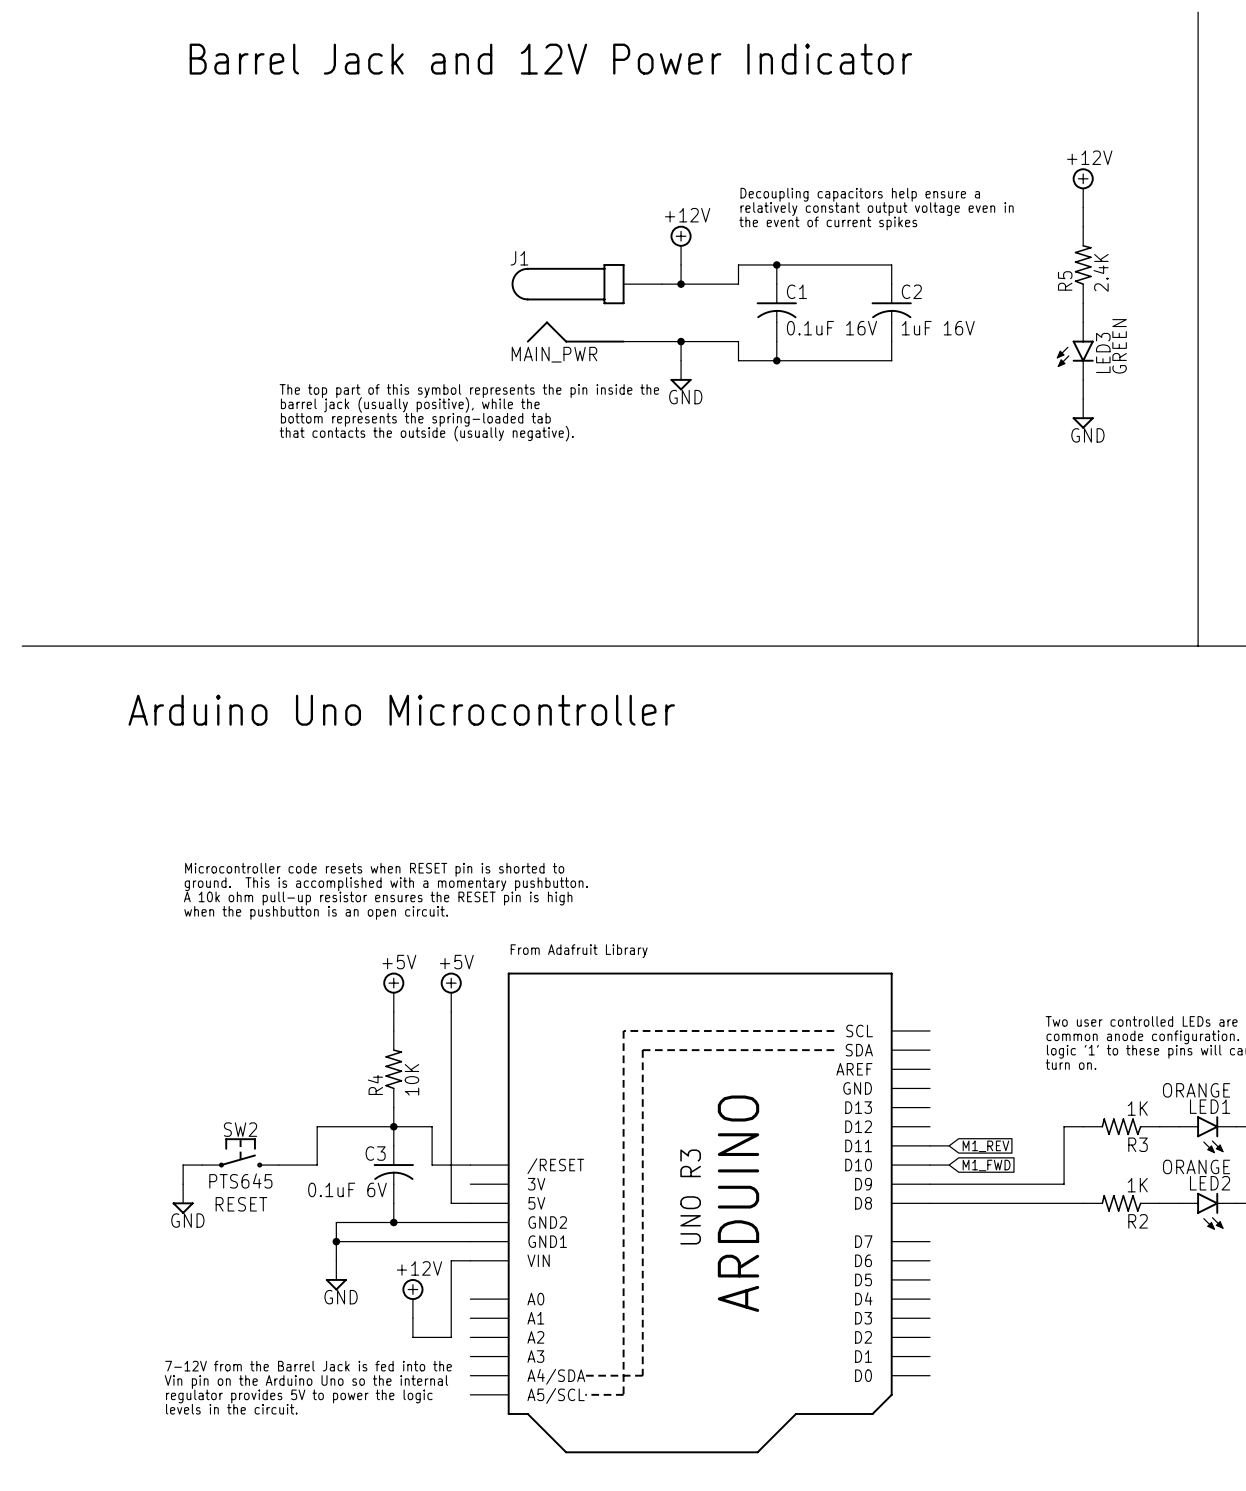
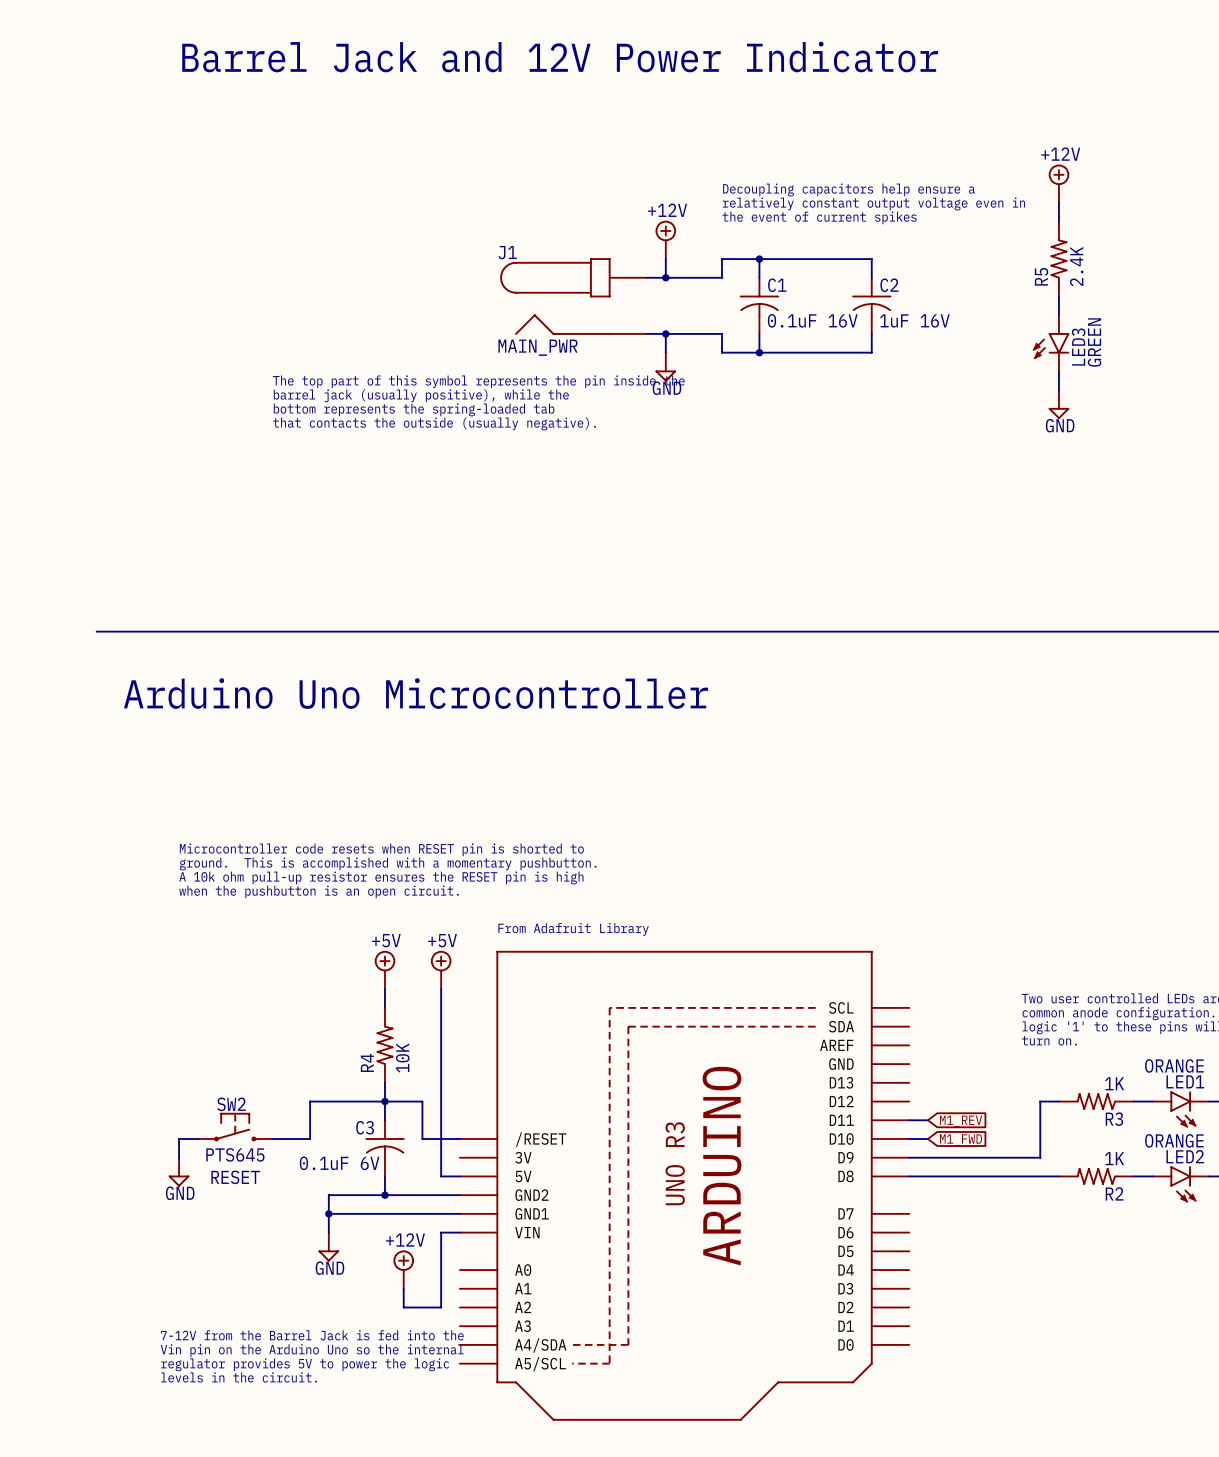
line: (1198, 12) (1198, 646) -> none
line: (22, 646) (98, 646) -> none

